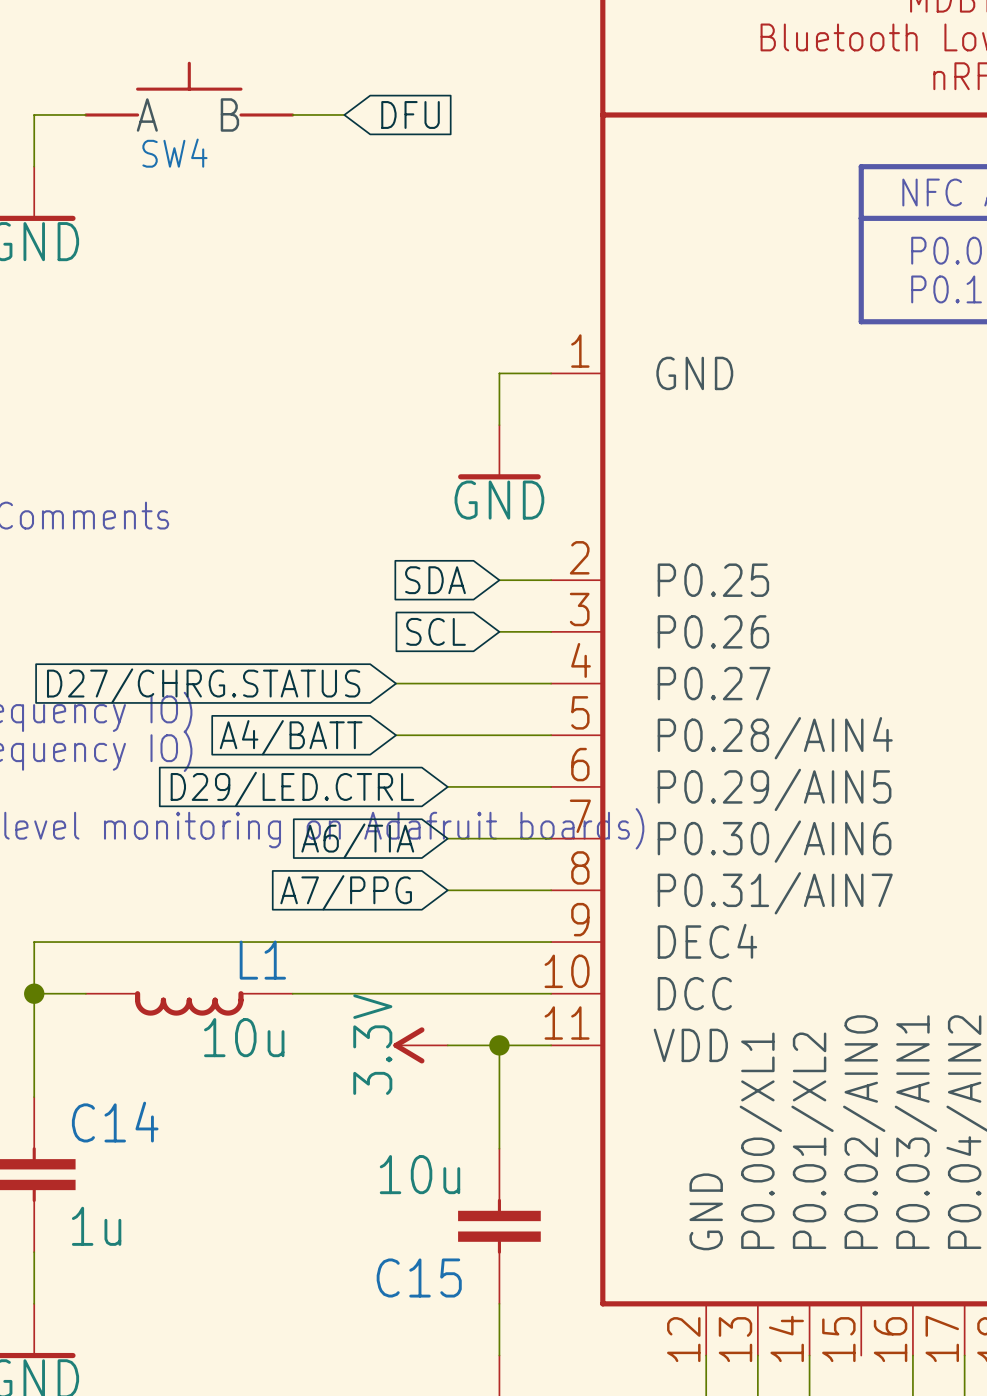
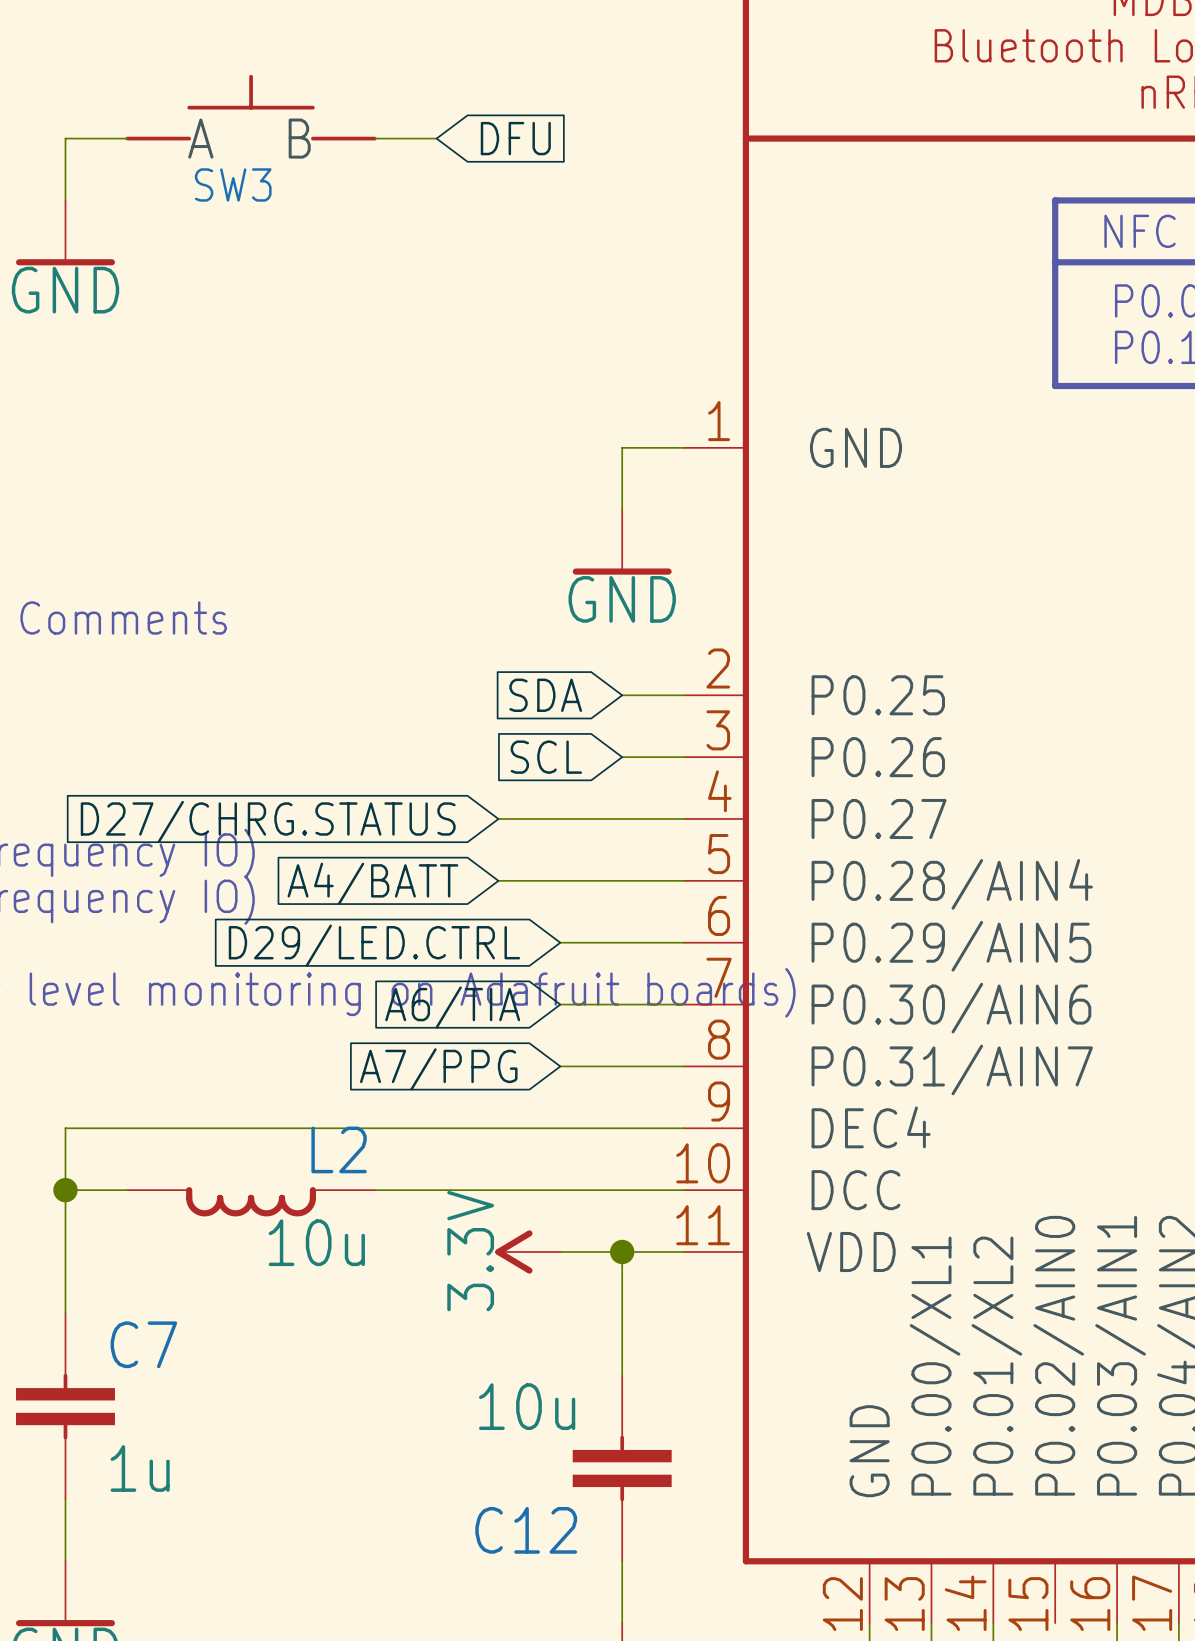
SW4 name: SW4 (174, 153) -> SW3 (233, 184)
L1 name: L1 (262, 960) -> L2 (339, 1149)
C14 name: C14 (115, 1122) -> C7 (143, 1344)
C15 name: C15 (419, 1278) -> C12 (526, 1530)

